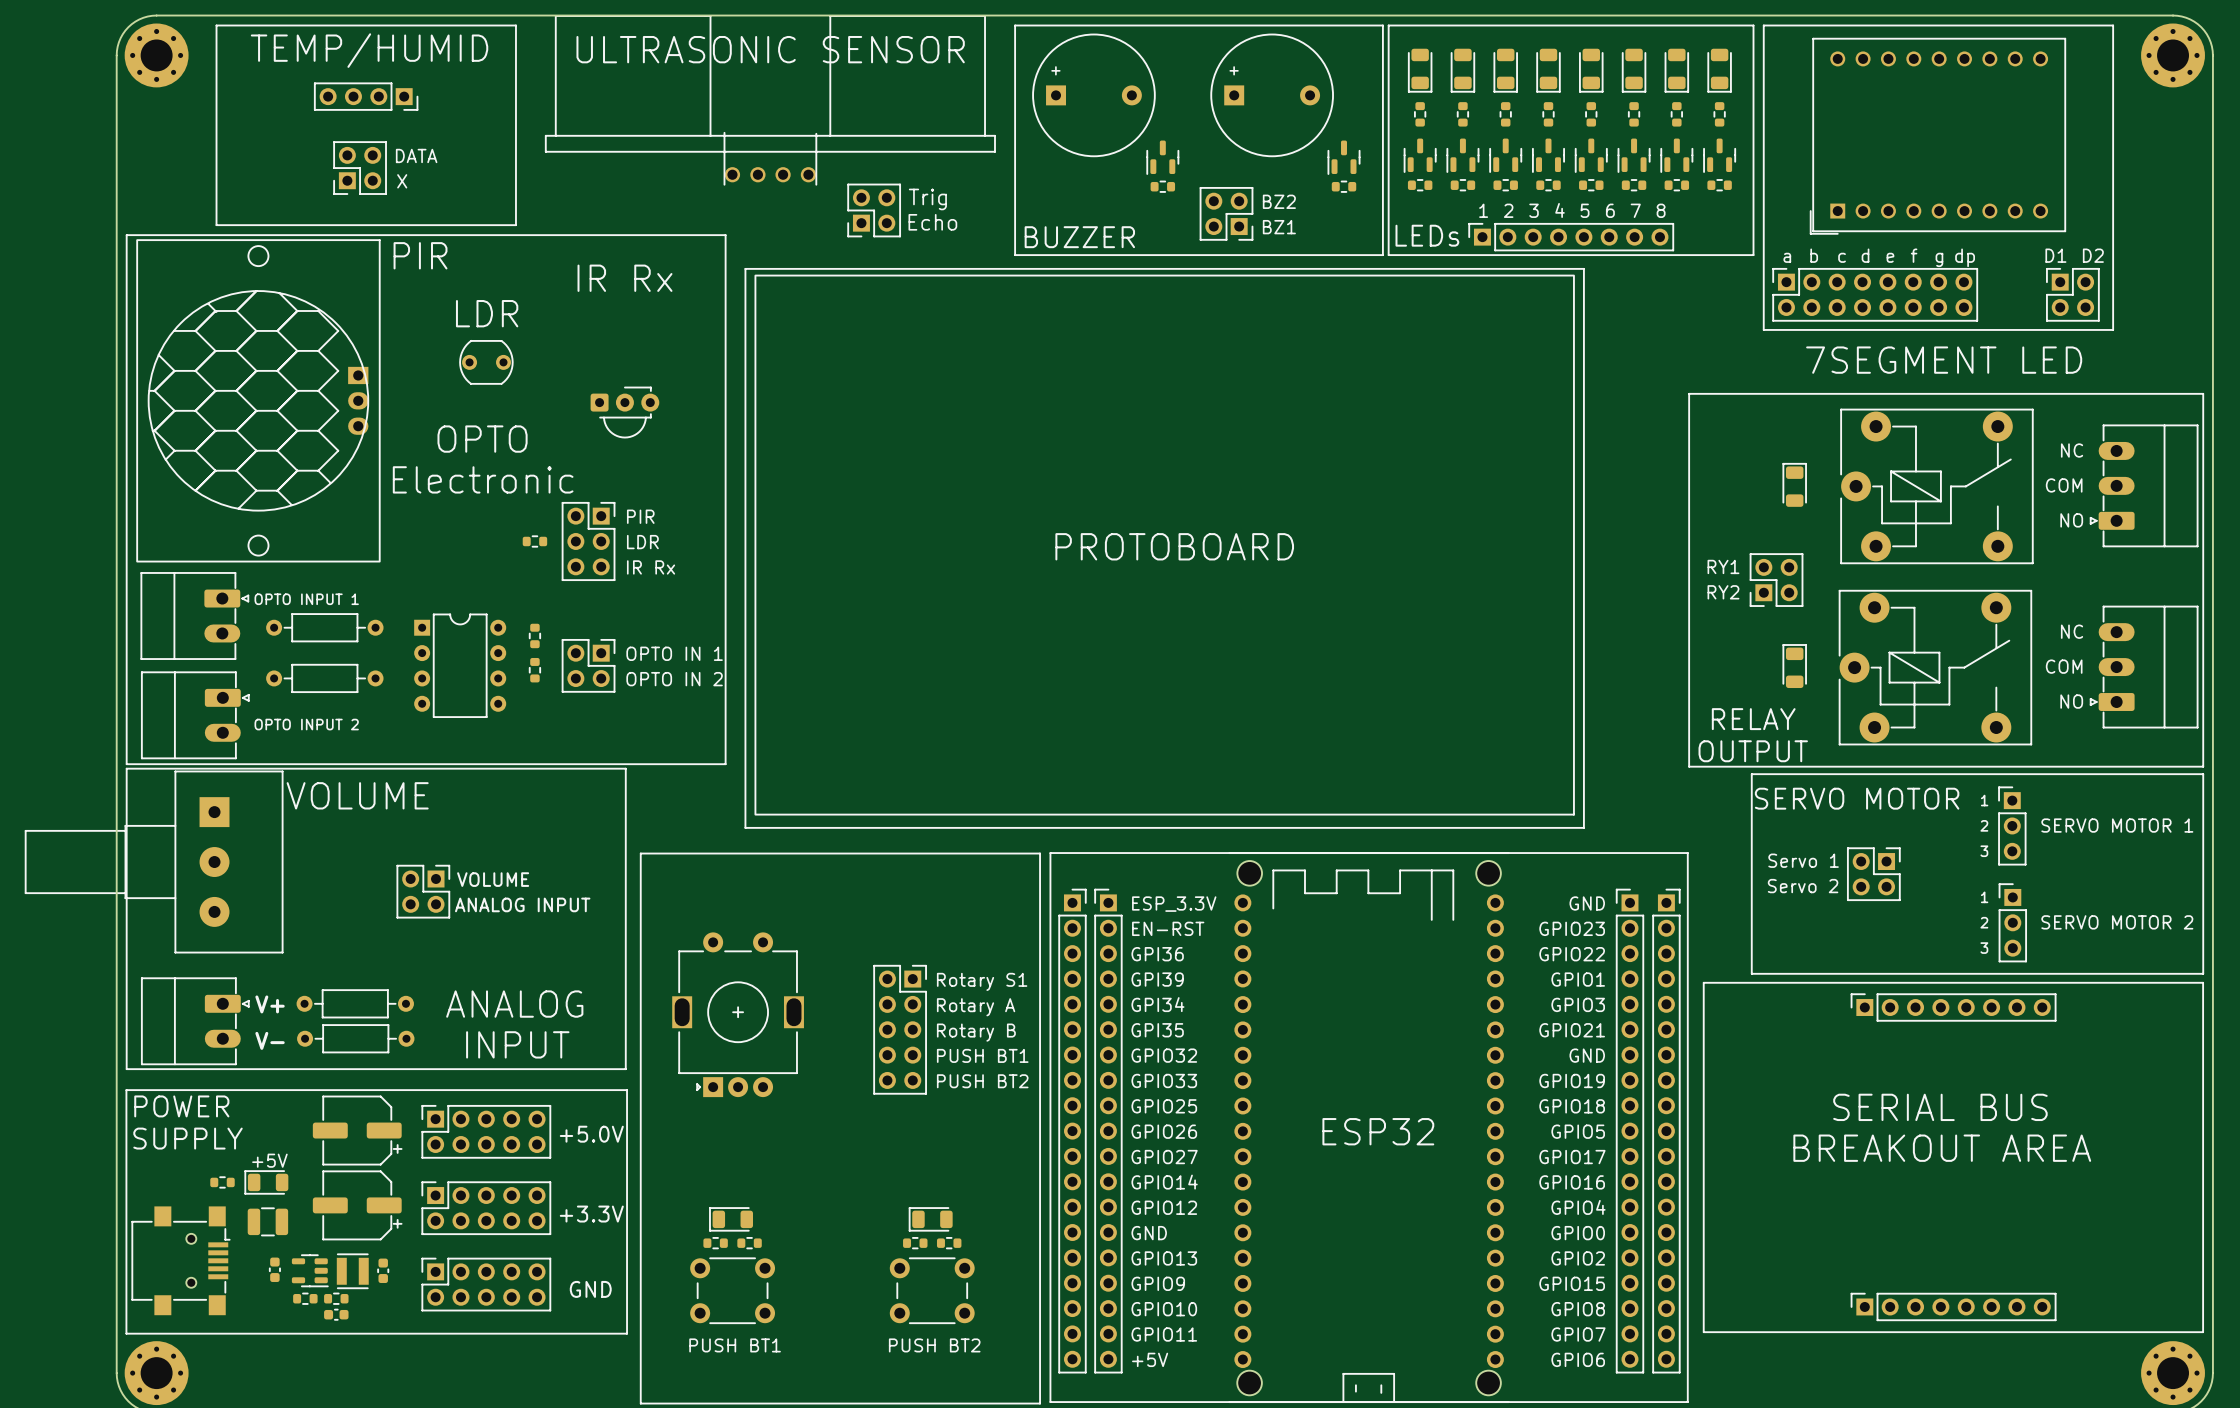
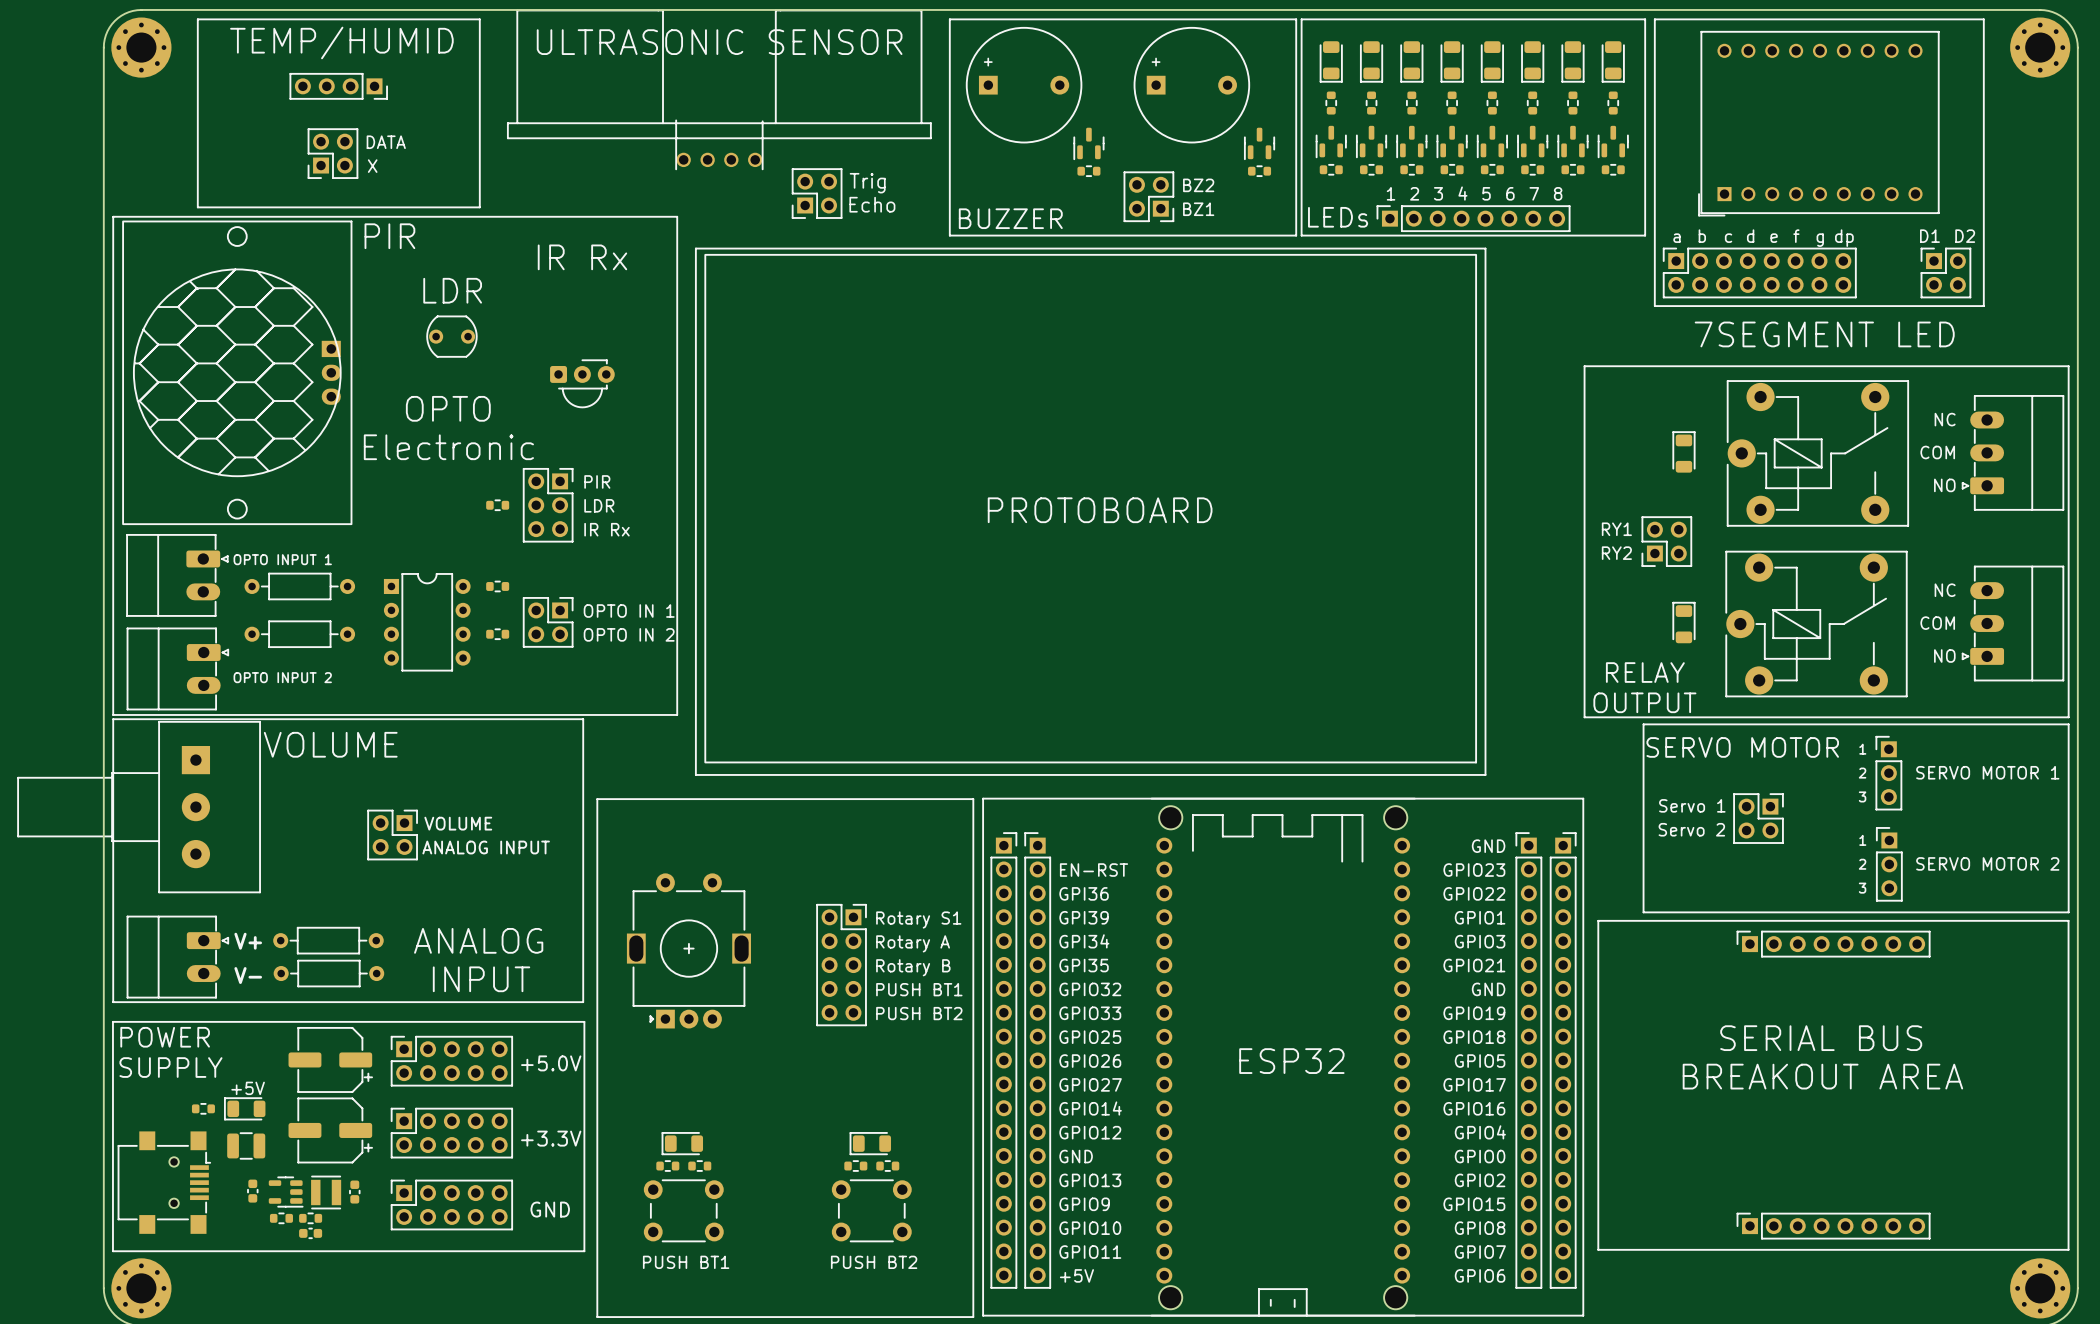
part rotation: 0° (534, 635) -> 90° clockwise (497, 586)
part rotation: 0° (534, 670) -> 90° clockwise (497, 634)
text: ESP_3.3V (1174, 904) -> none

